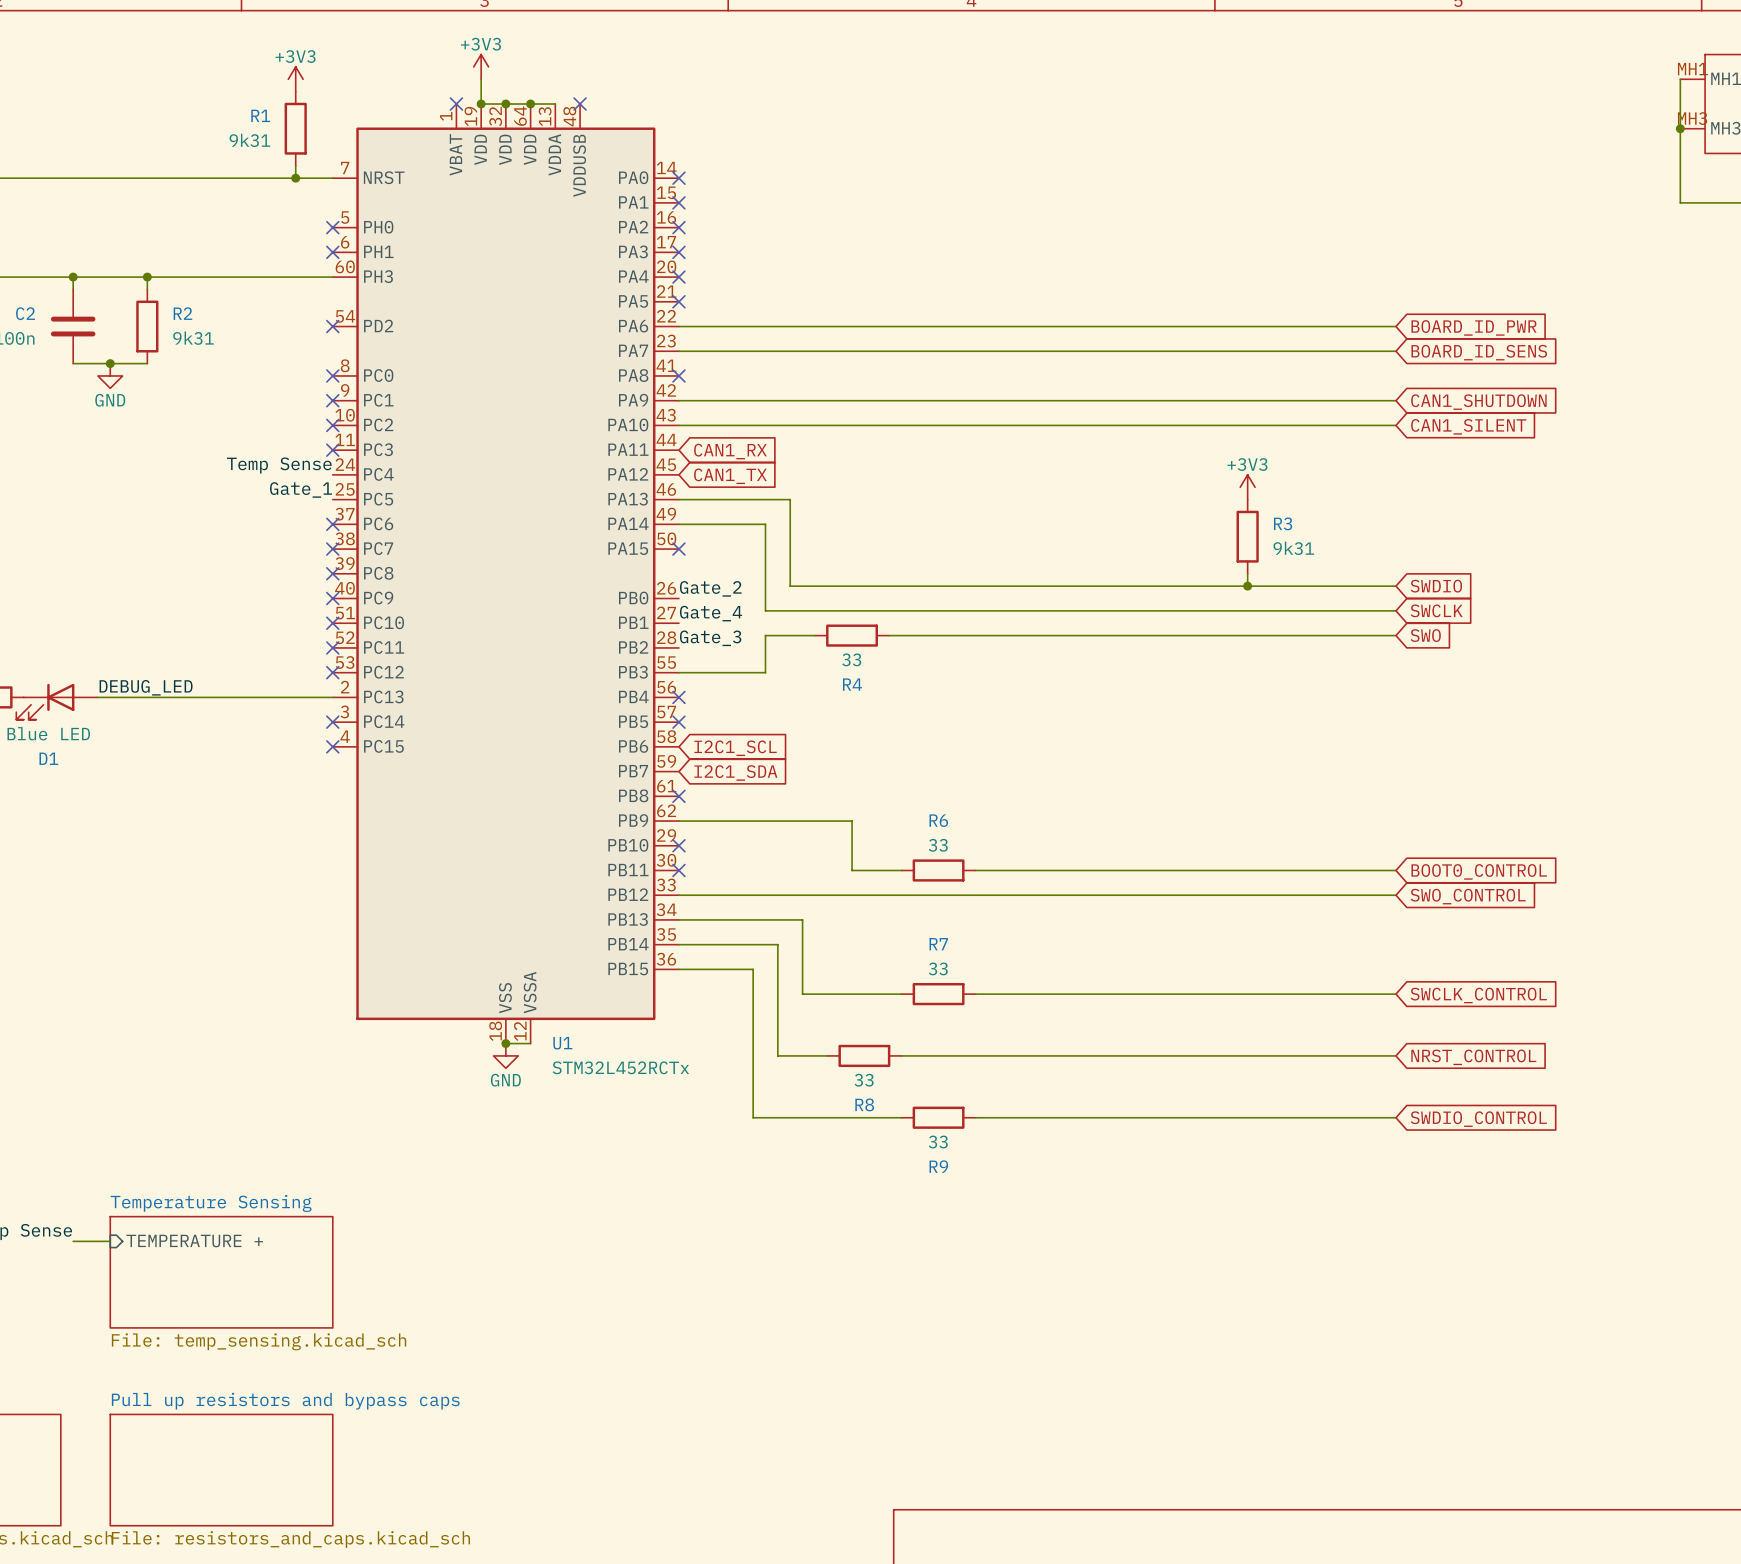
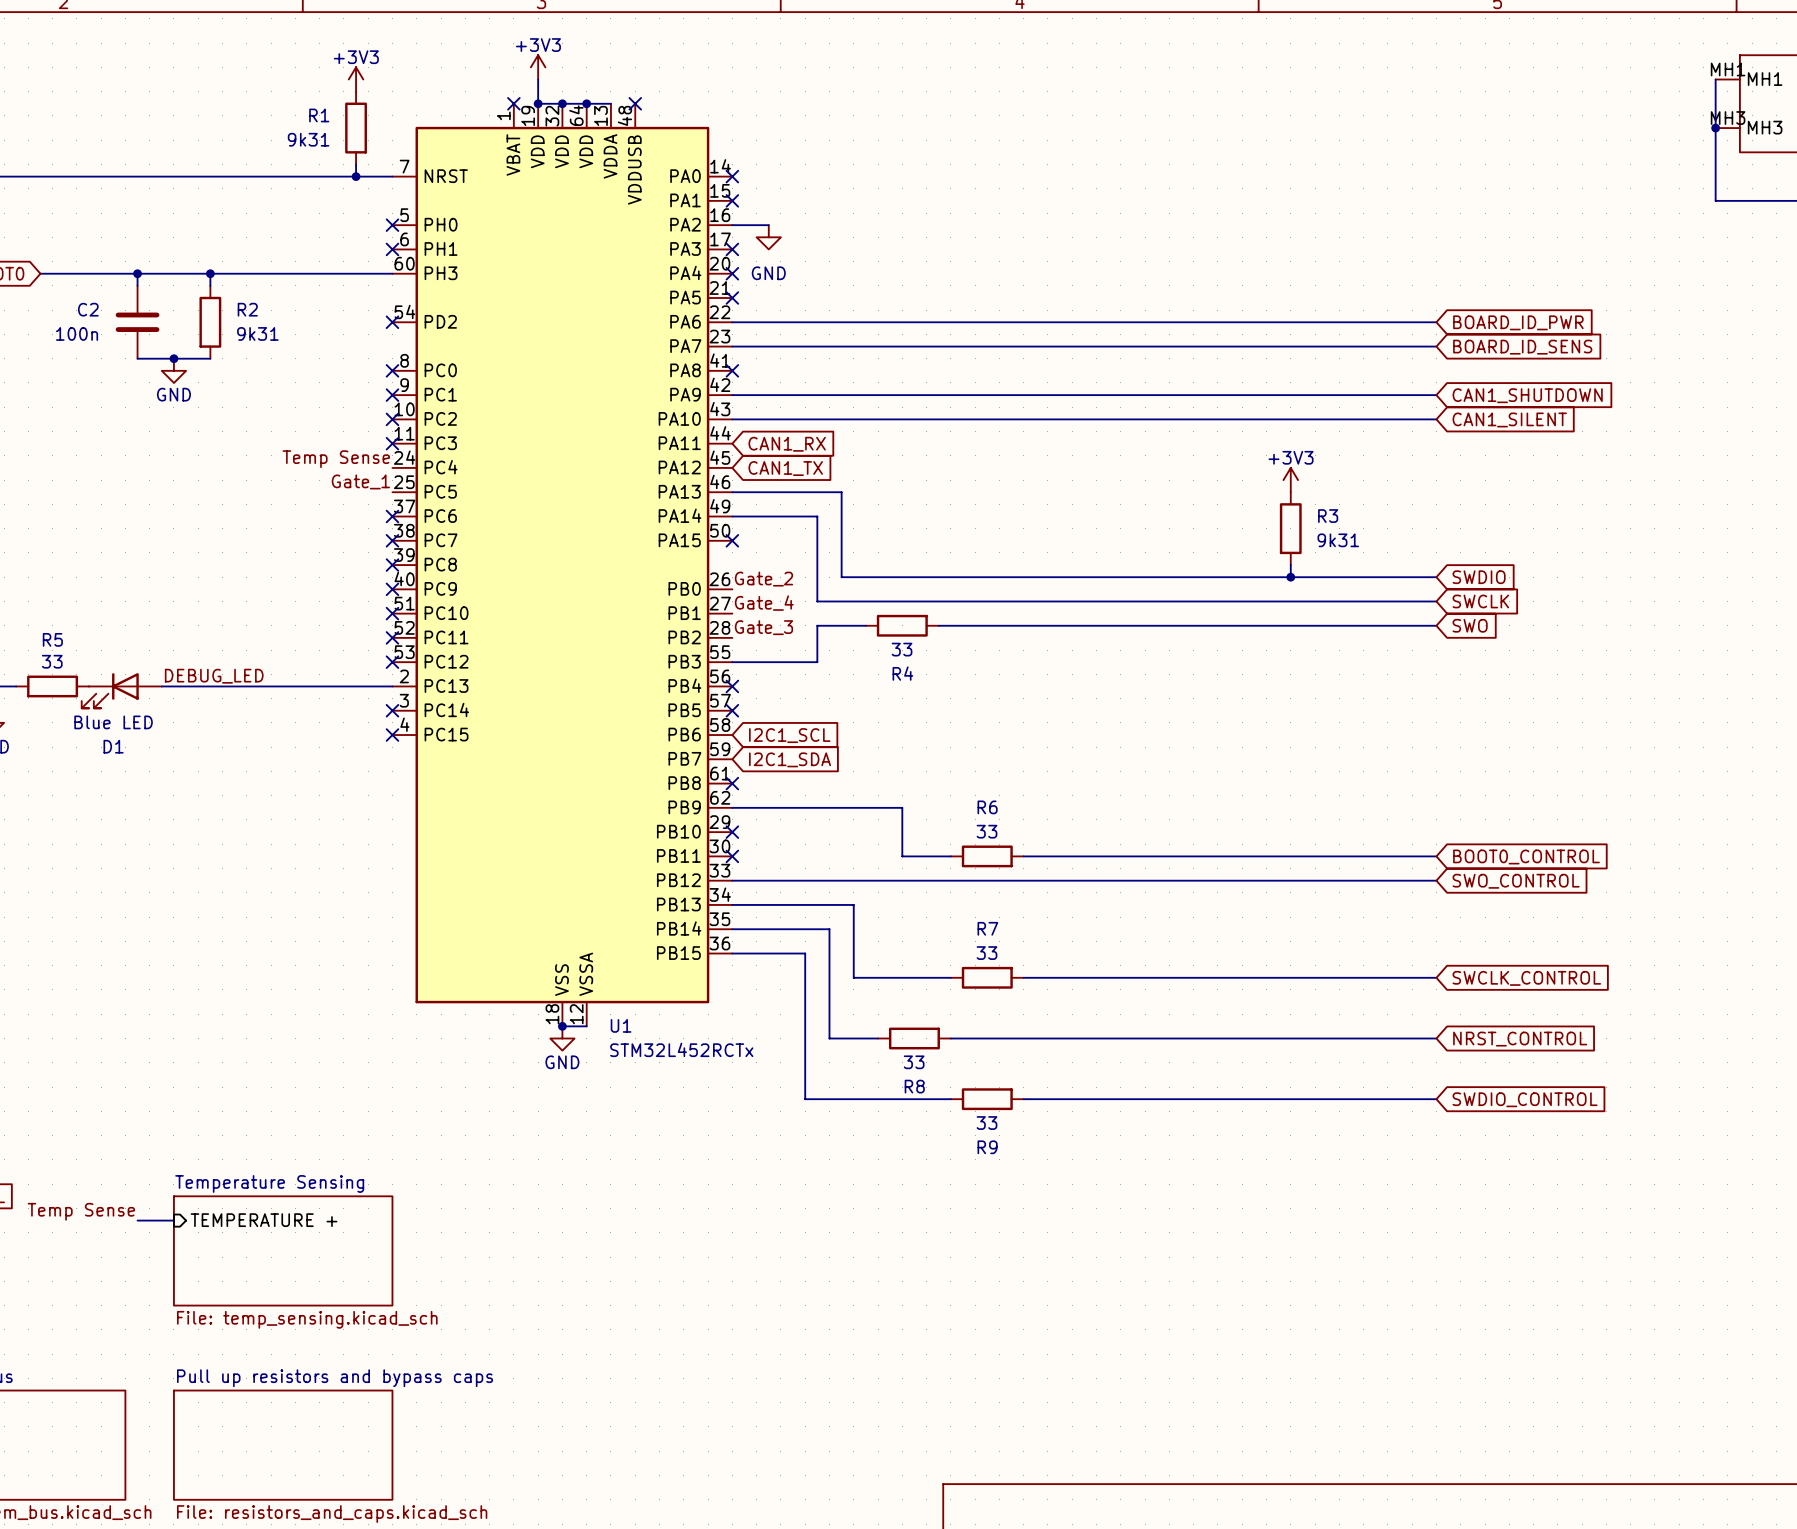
wire: none -> (732, 225) (768, 225)
no-connect mark: (678, 227) -> none
power symbol: none -> GND (768, 237)

